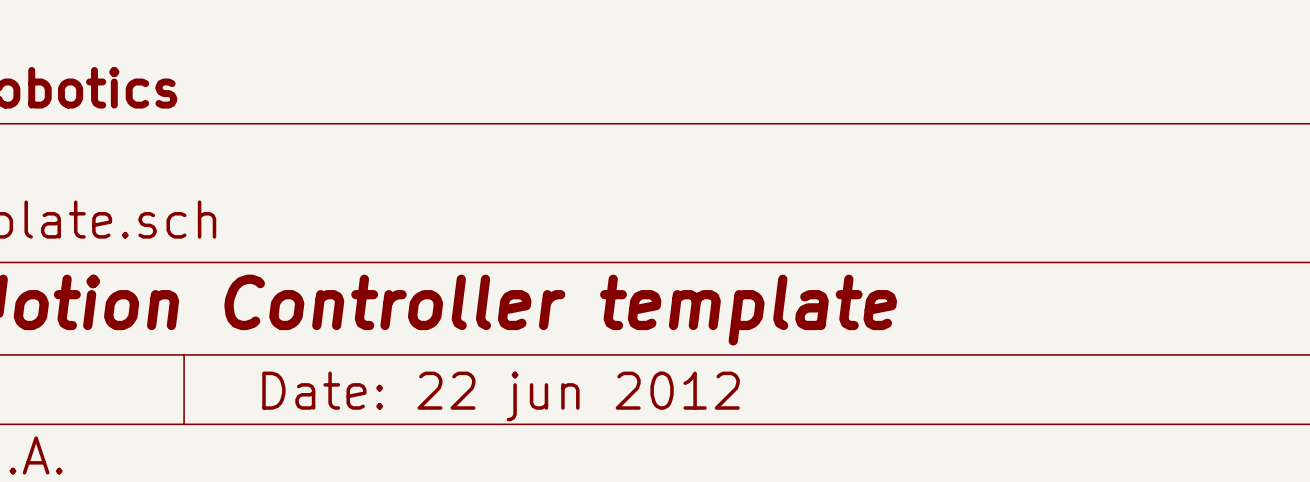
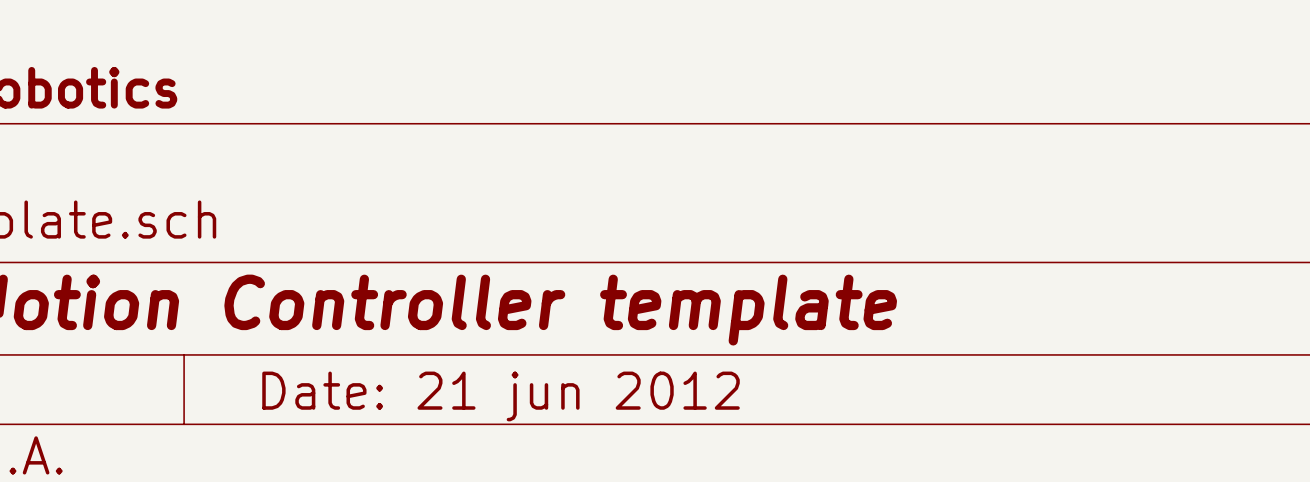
title block: Date: 22 jun 2012 (501, 396) -> Date: 21 jun 2012 (501, 396)

